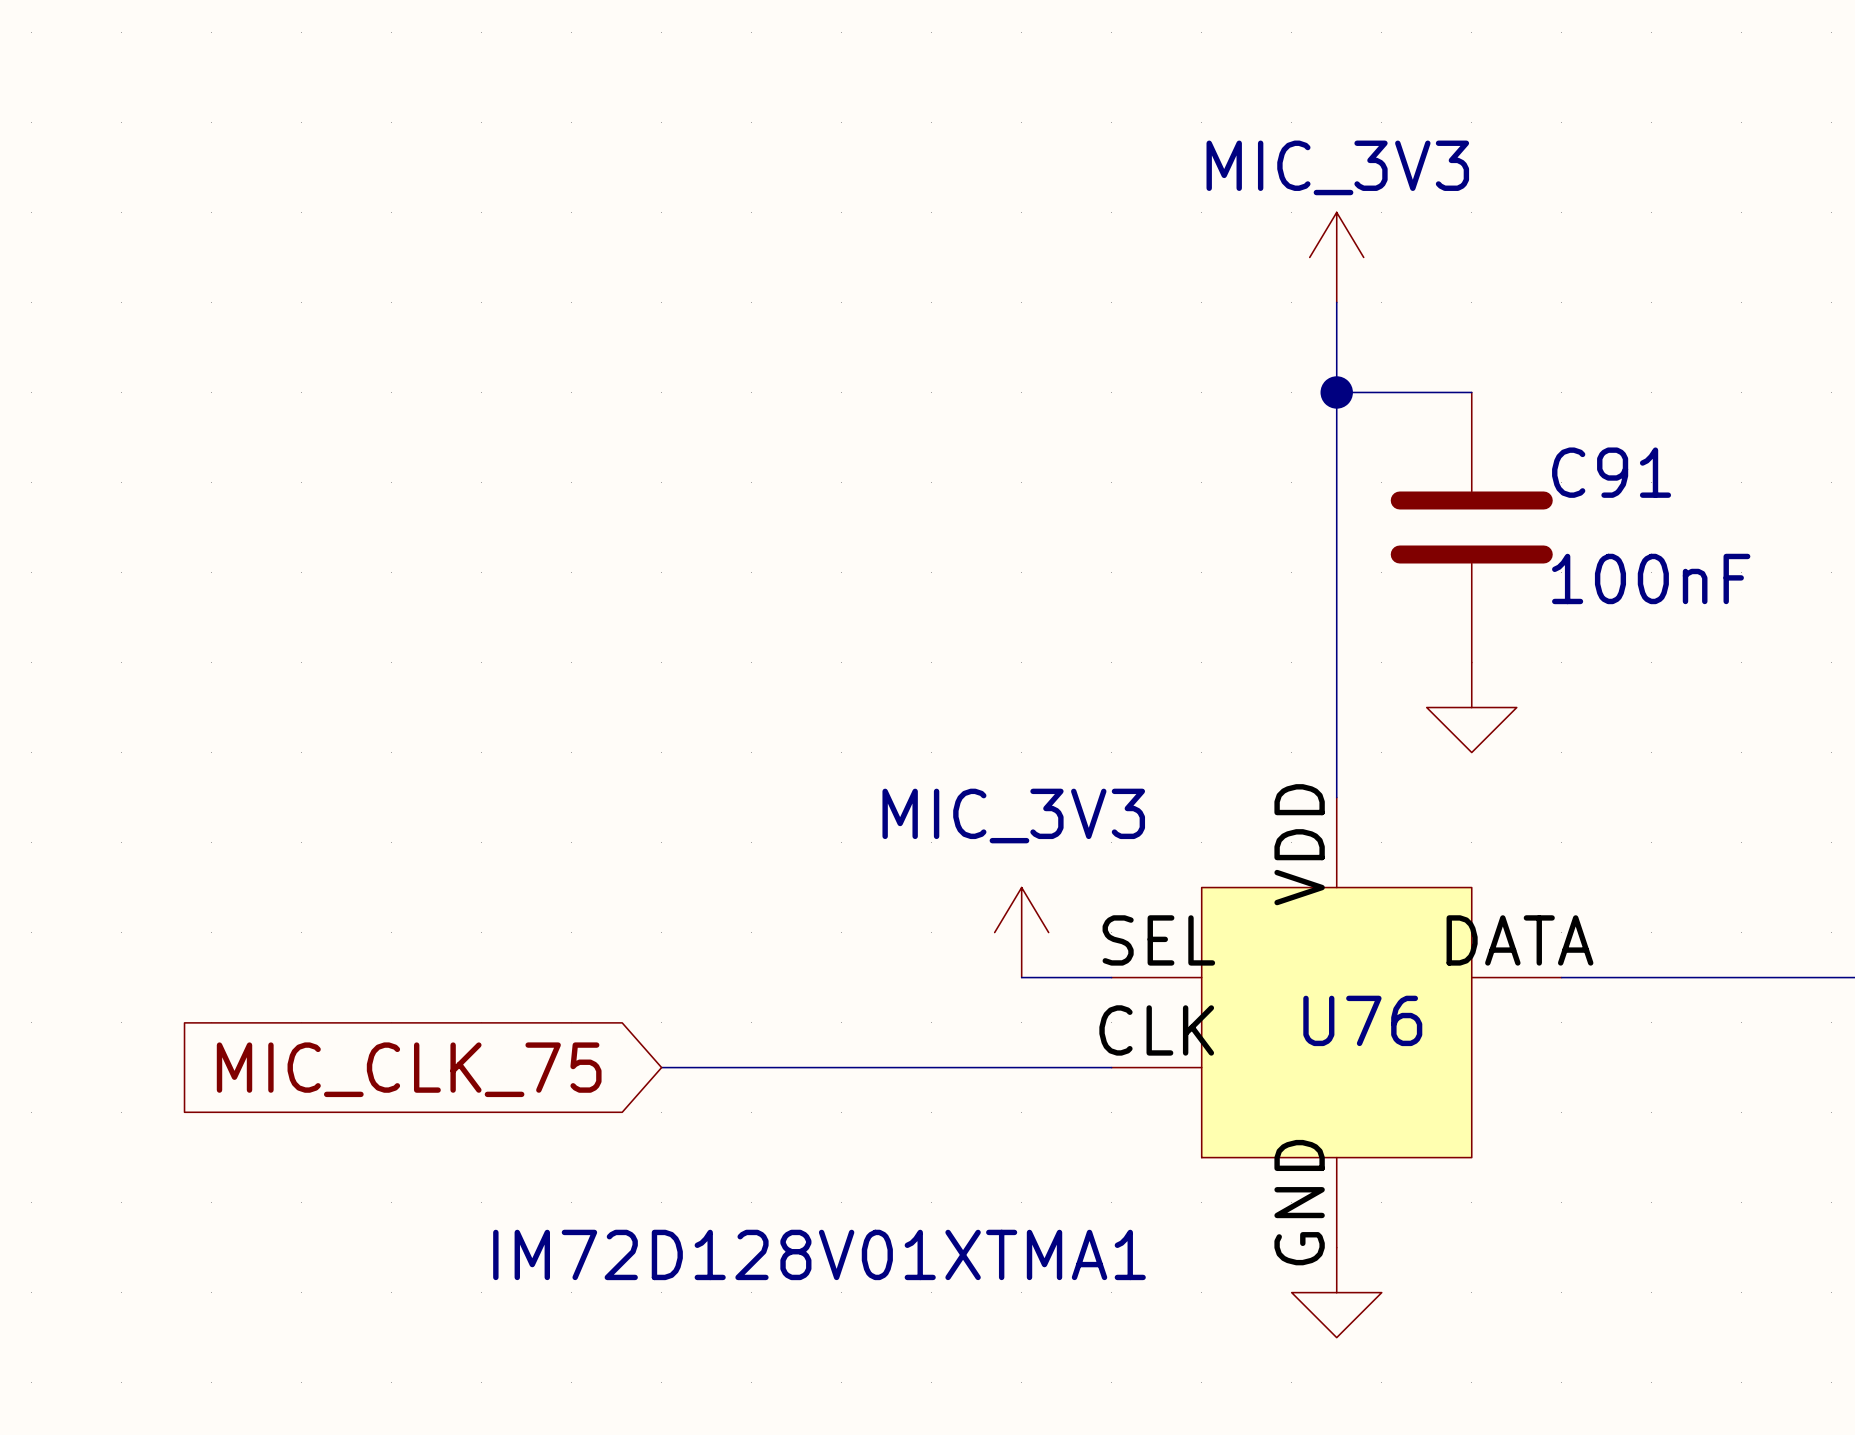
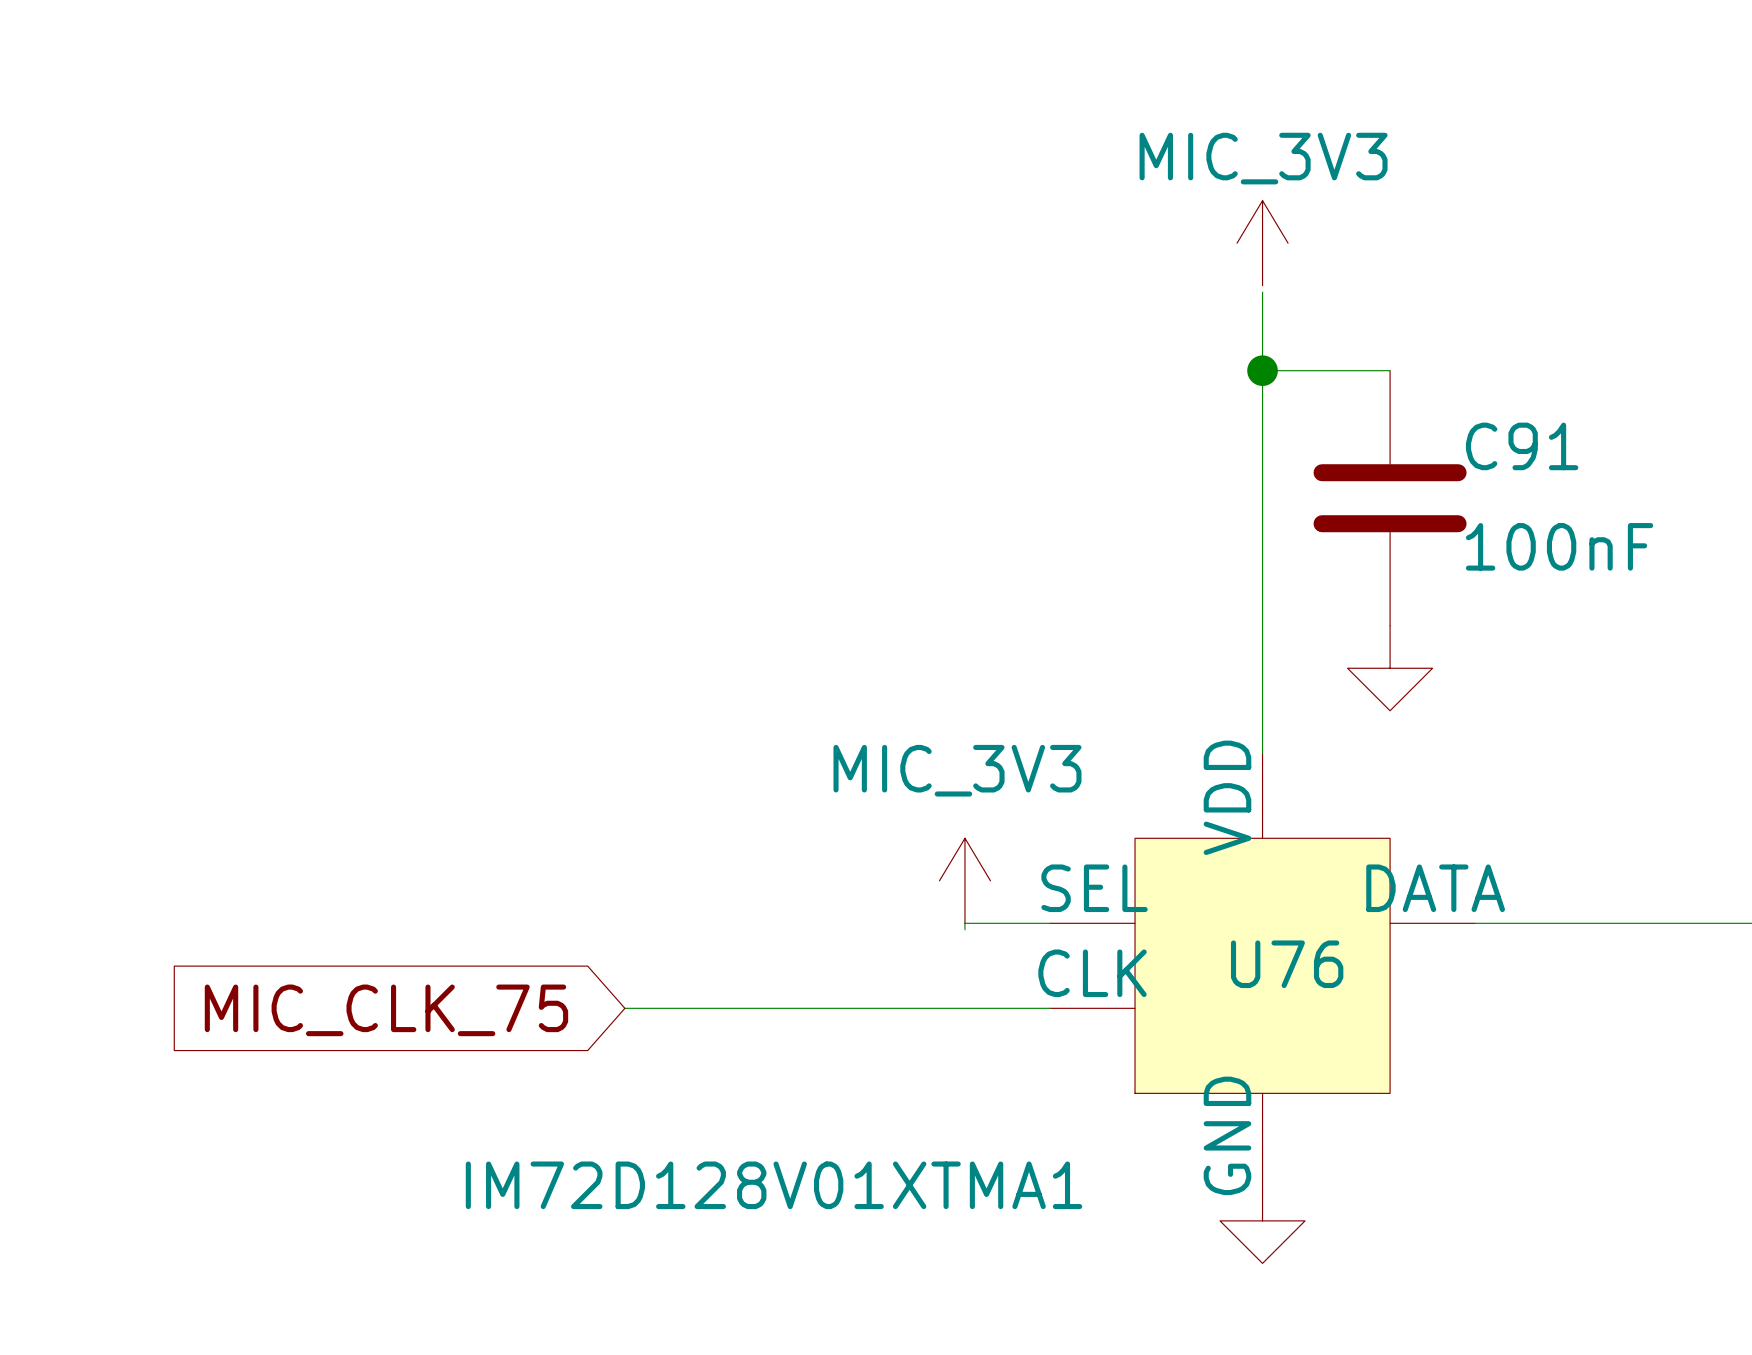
wire: (1336, 302) (1336, 309) -> (964, 923) (964, 929)

